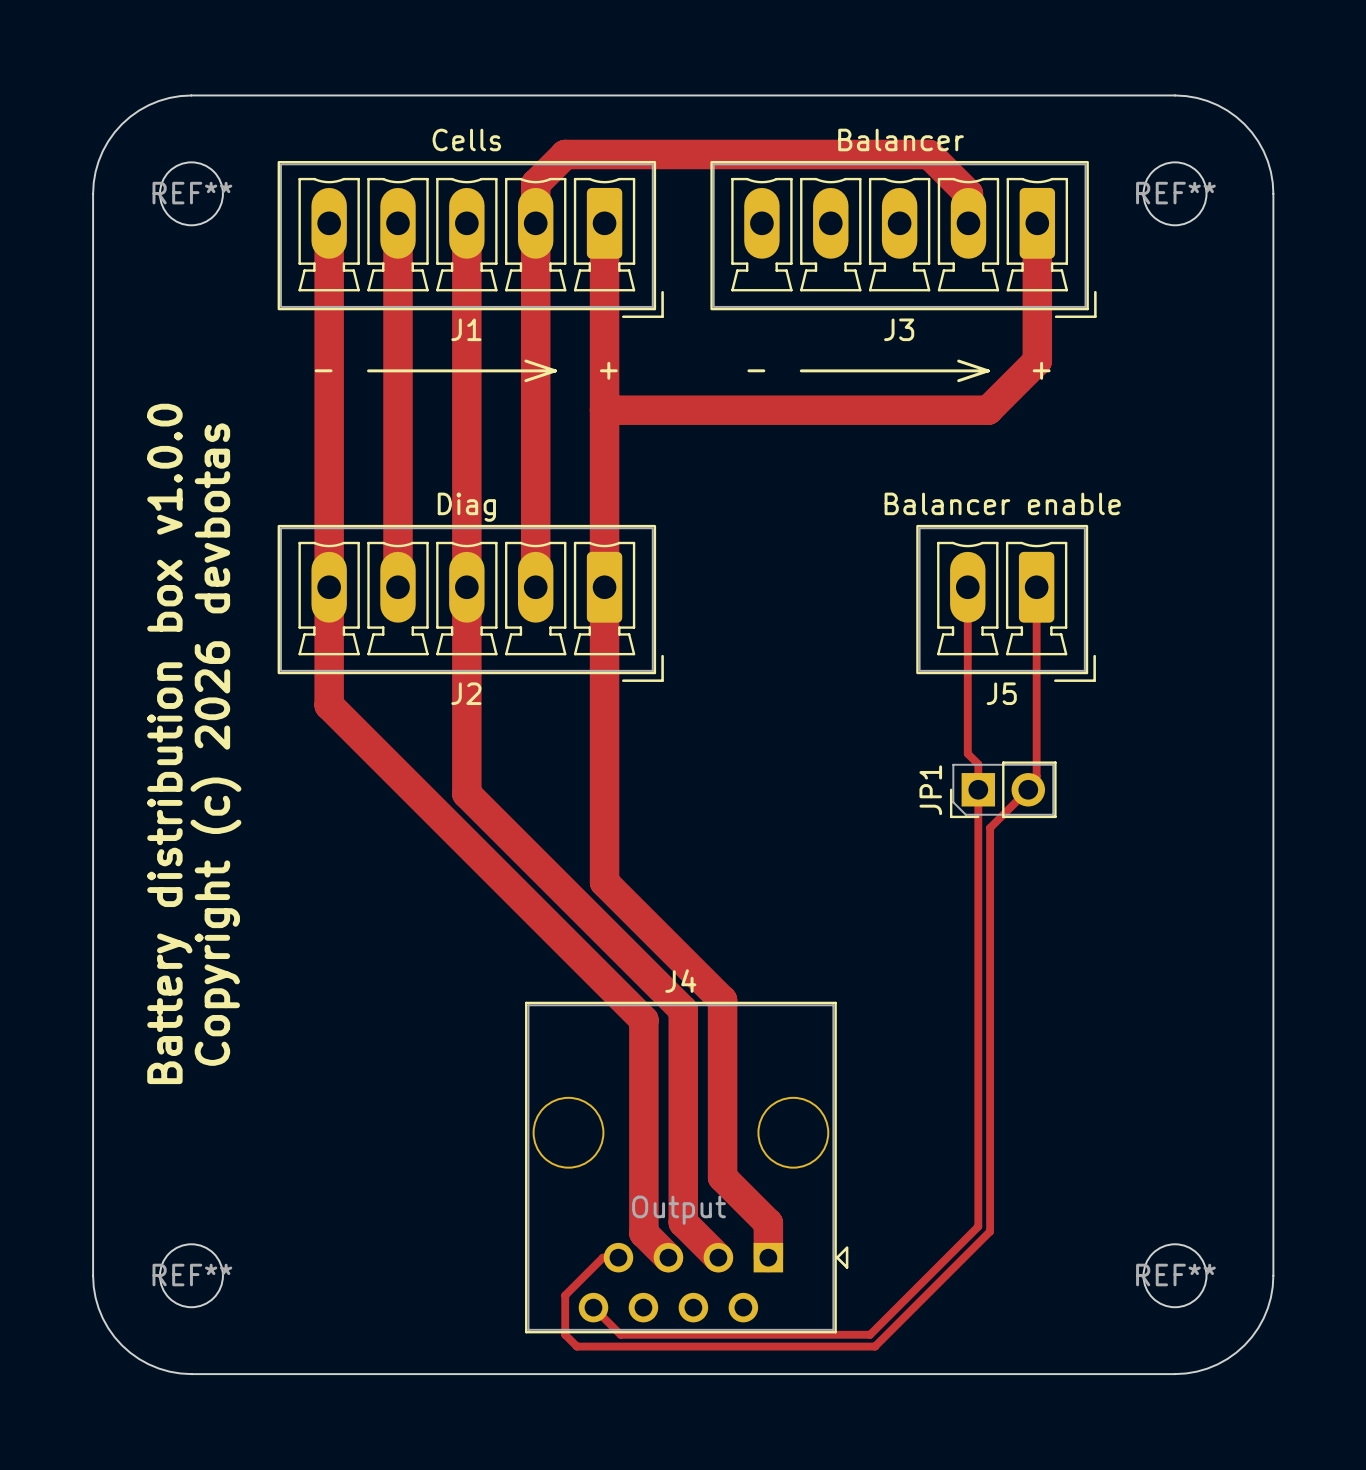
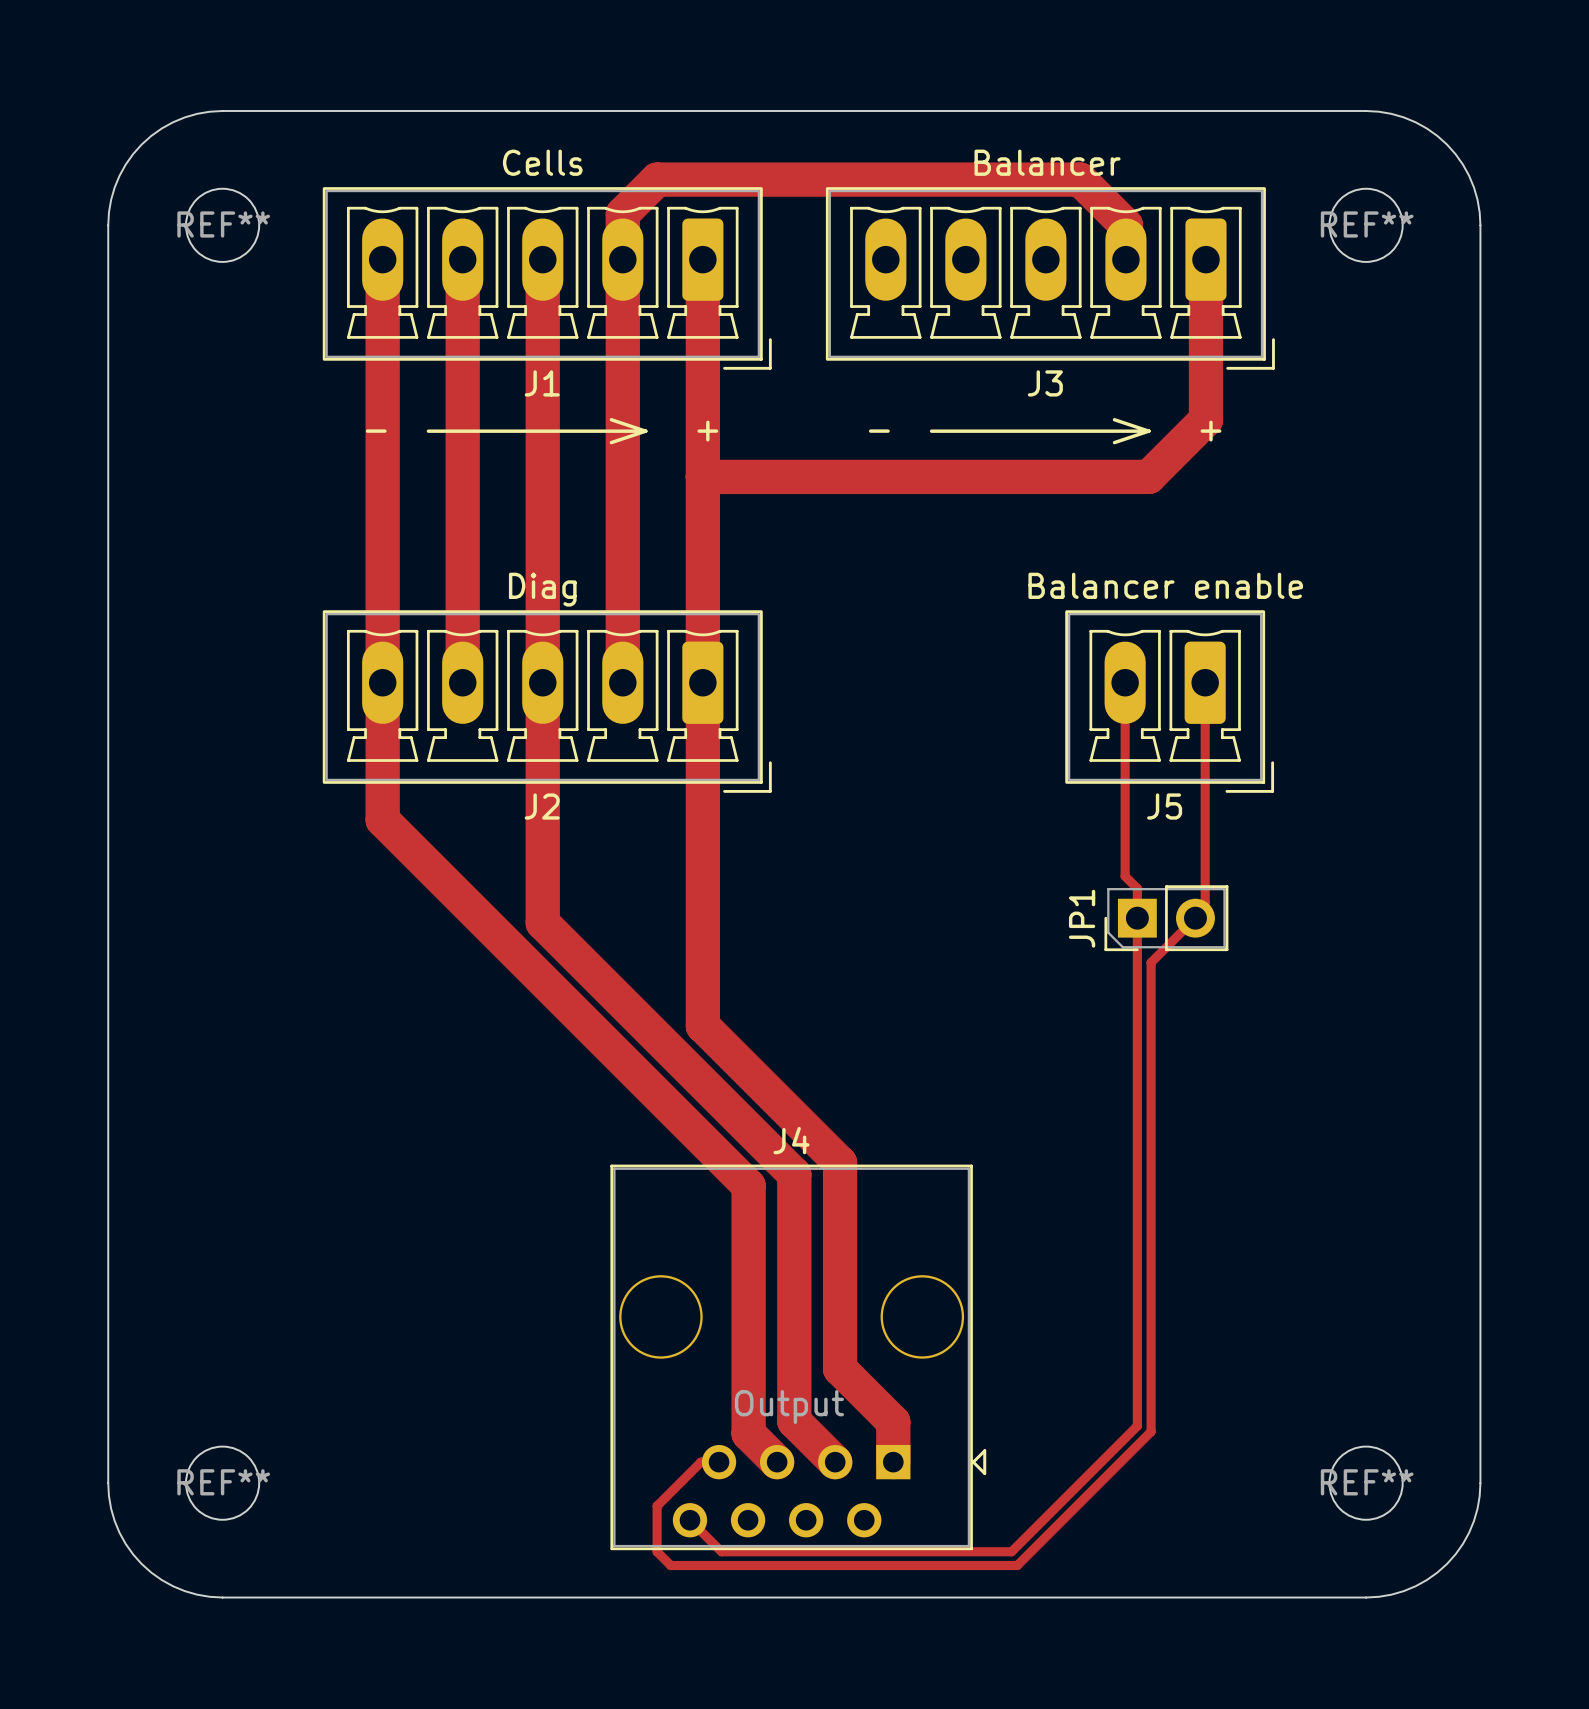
text: Battery distribution box v1.0.0 (169, 743) -> none
text: Copyright (c) 2026 devbotas (215, 744) -> none

